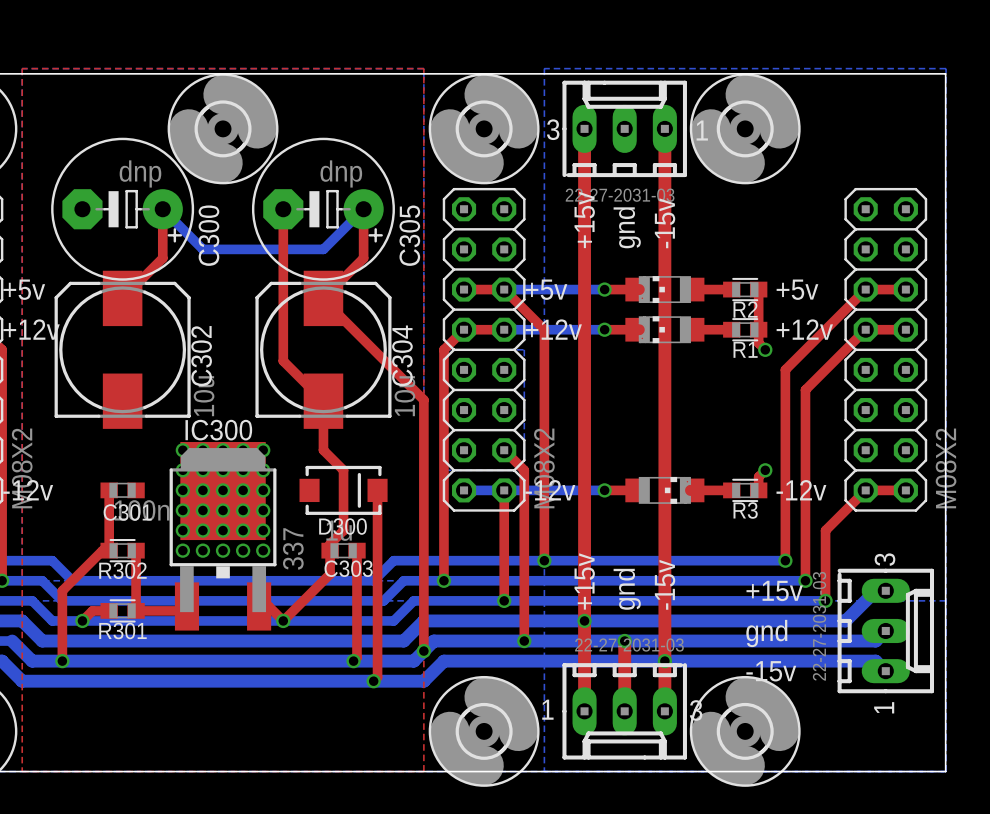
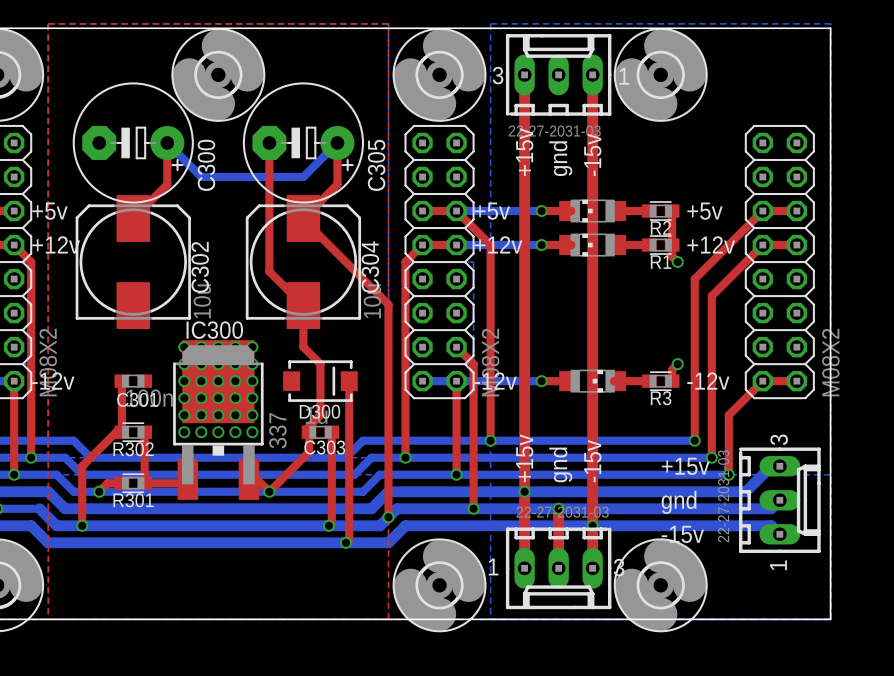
C300 value: dnp (140, 173) -> none
C305 value: dnp (341, 173) -> none

